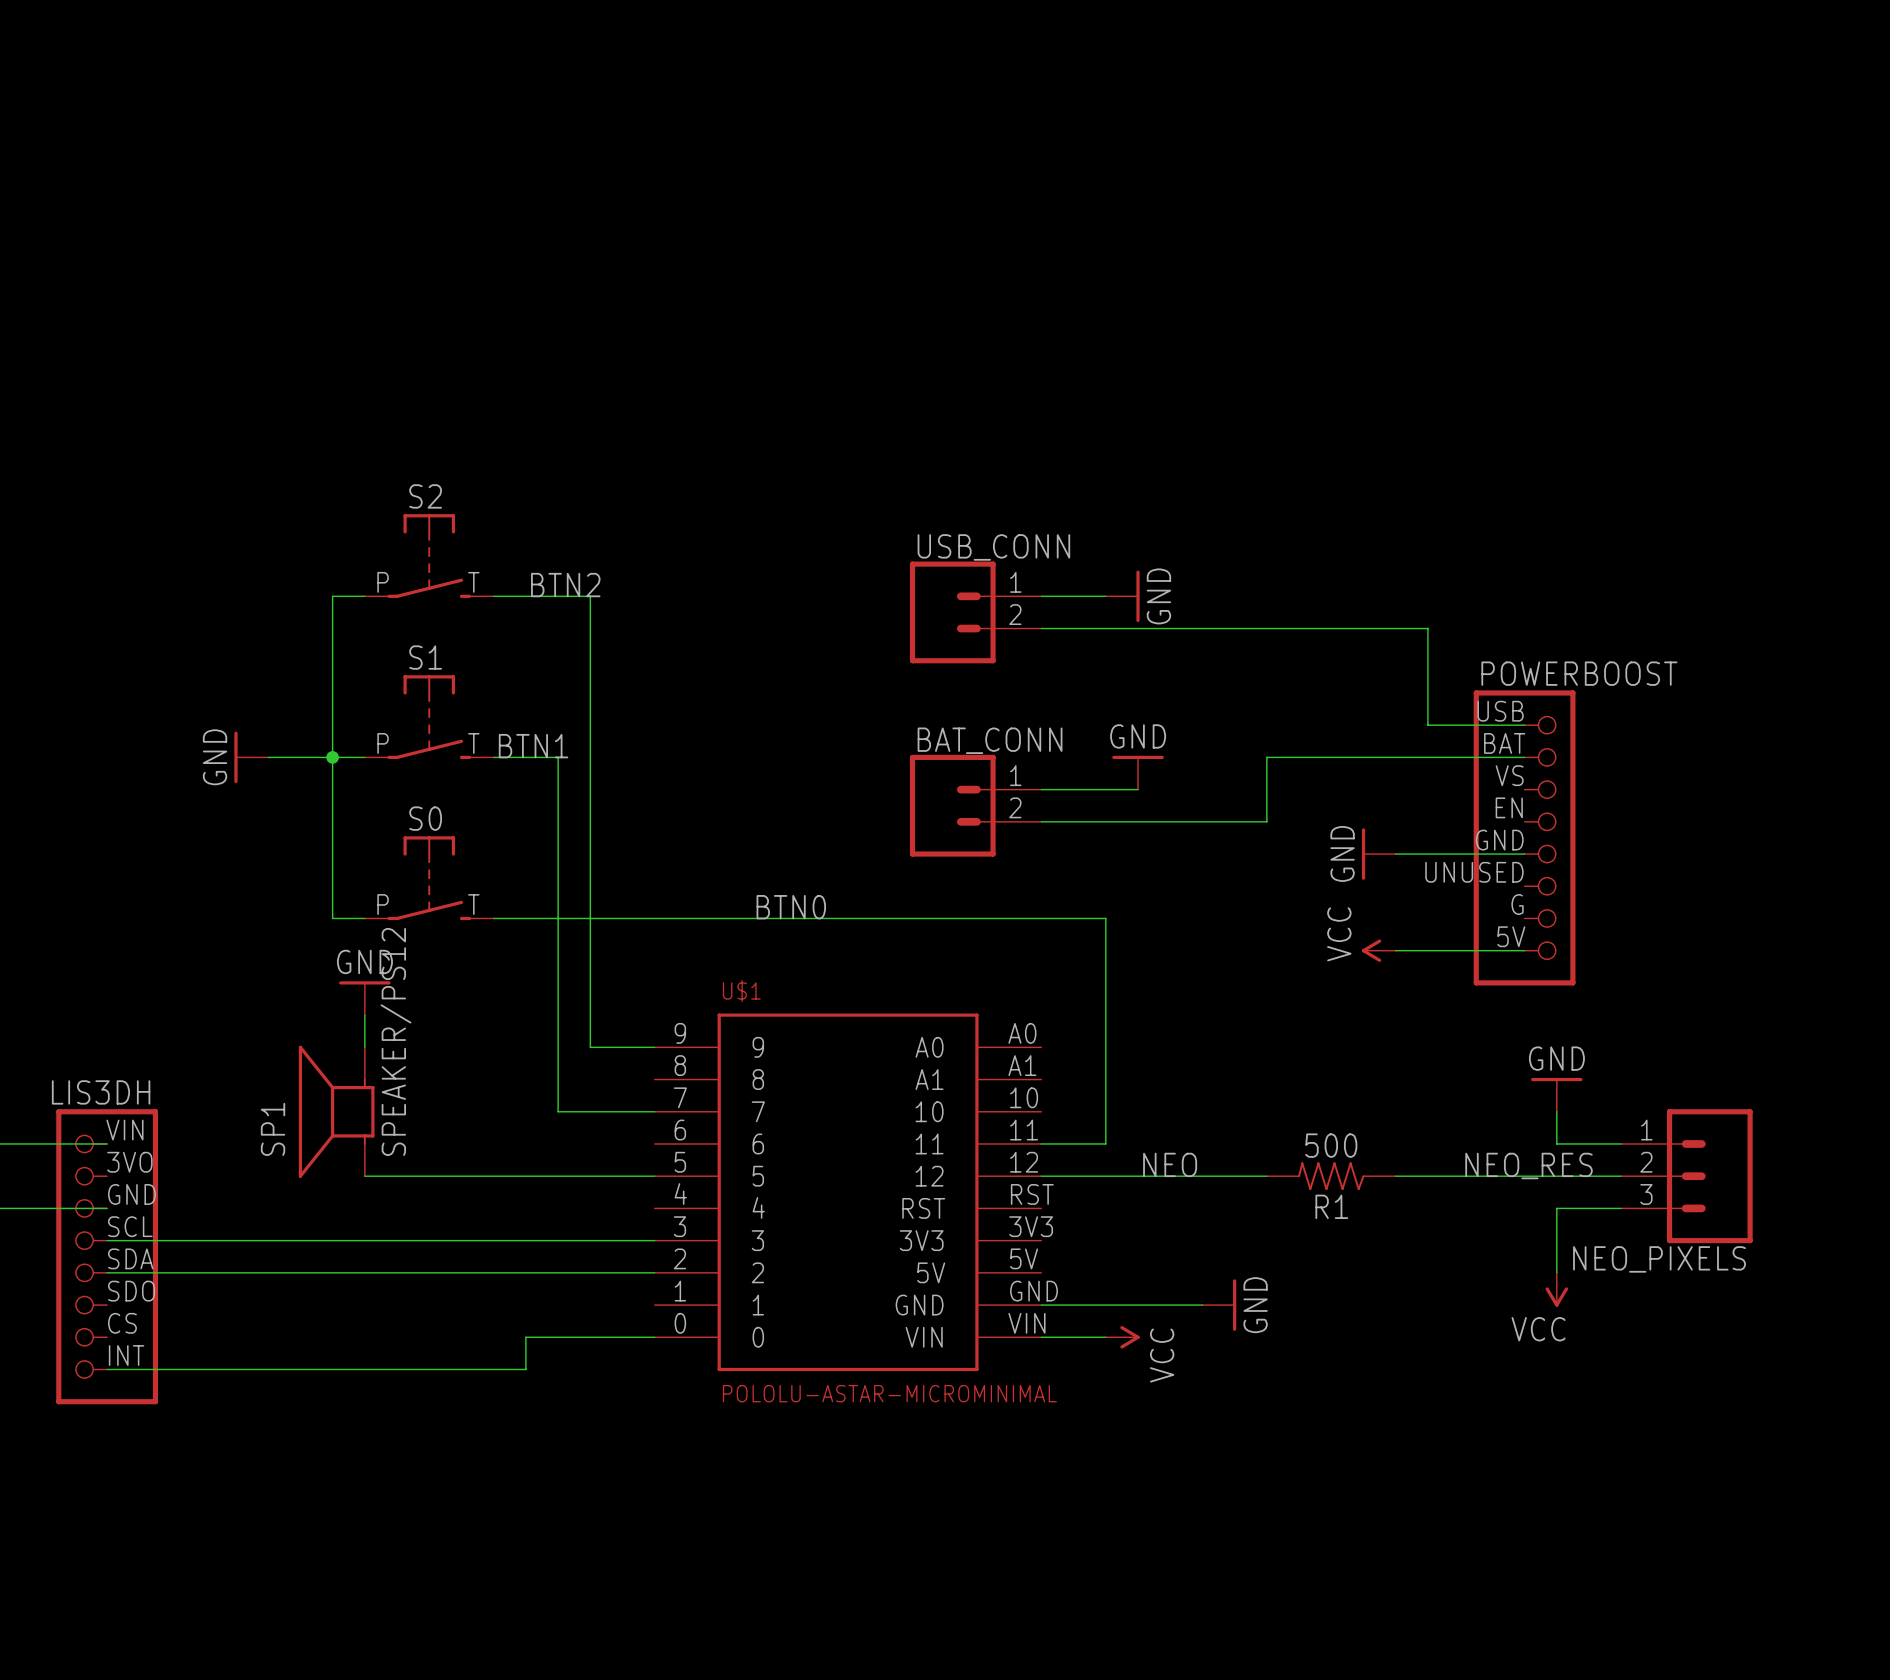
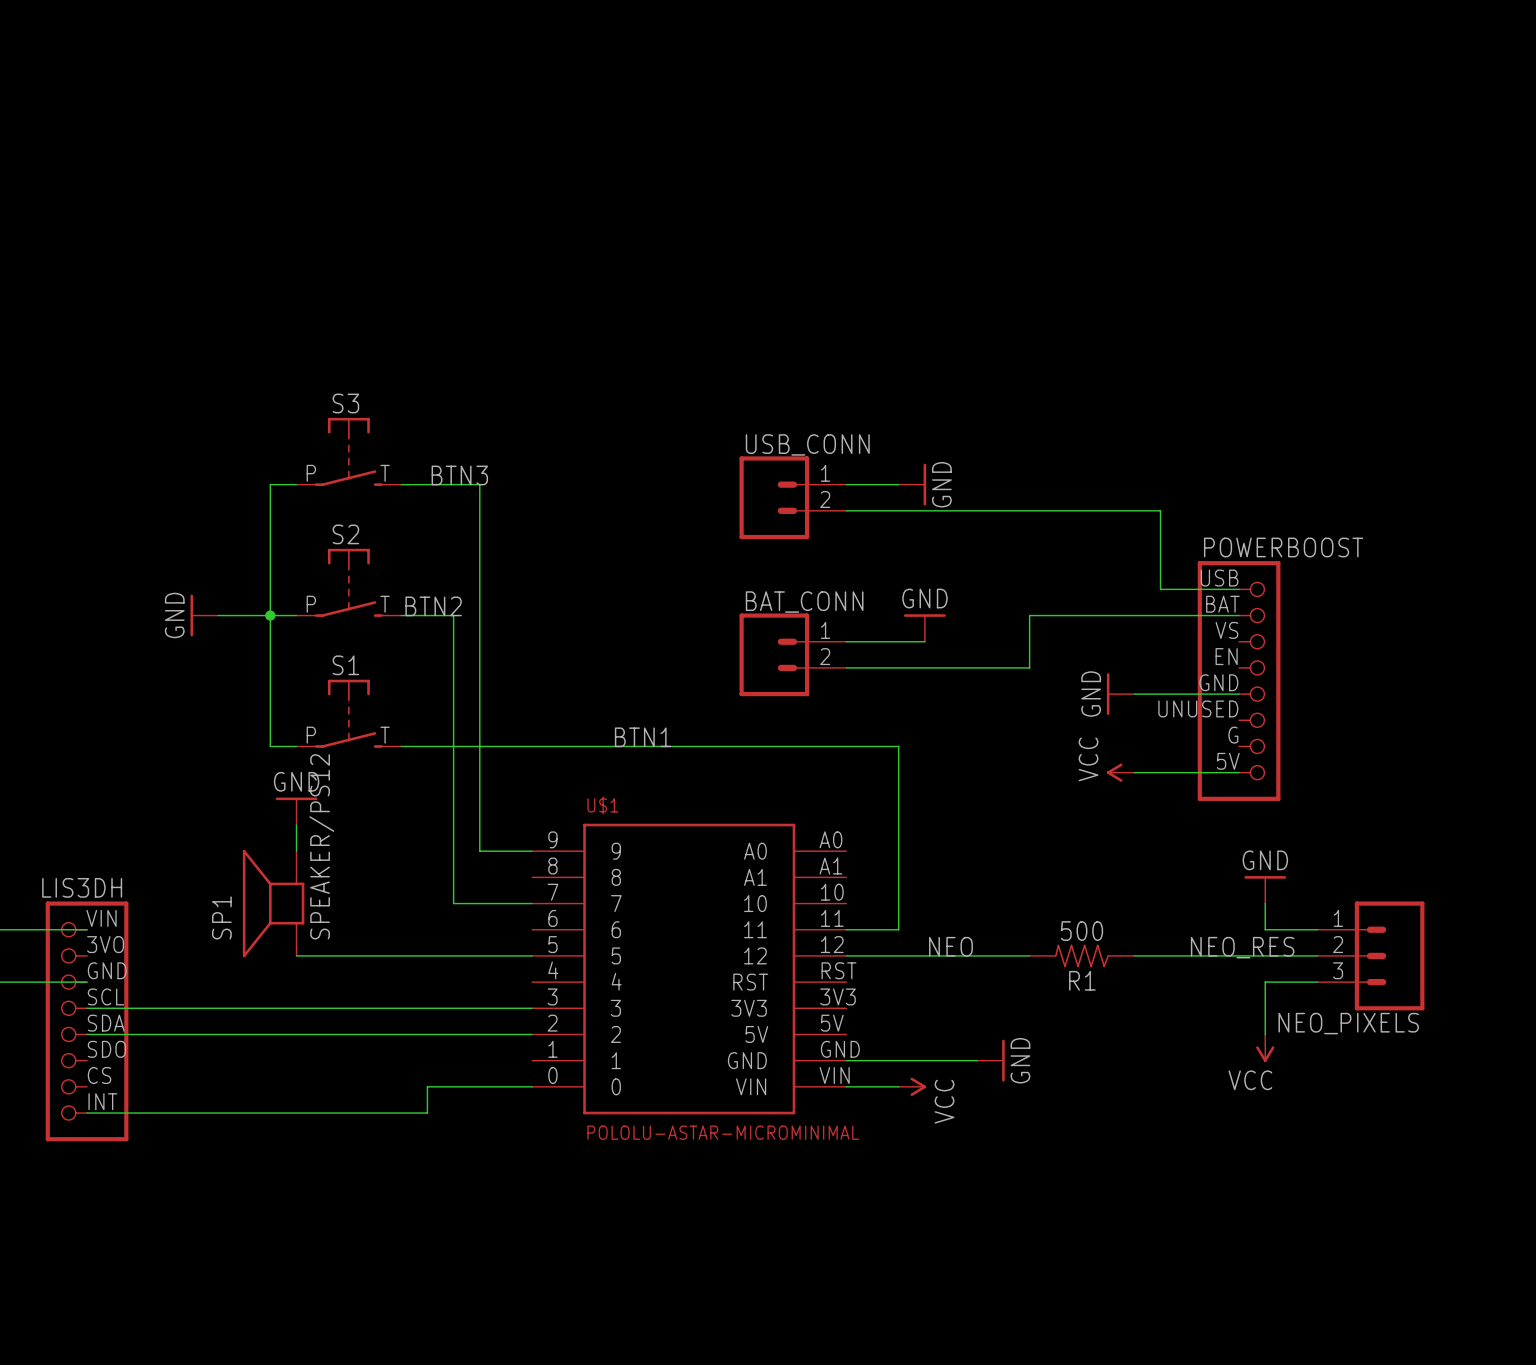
S2 name: S2 (425, 496) -> S3 (345, 403)
label: BTN2 (565, 585) -> BTN3 (459, 475)
S1 name: S1 (425, 657) -> S2 (345, 534)
label: BTN1 (533, 746) -> BTN2 (433, 606)
S0 name: S0 (425, 818) -> S1 (345, 665)
label: BTN0 (791, 907) -> BTN1 (643, 737)

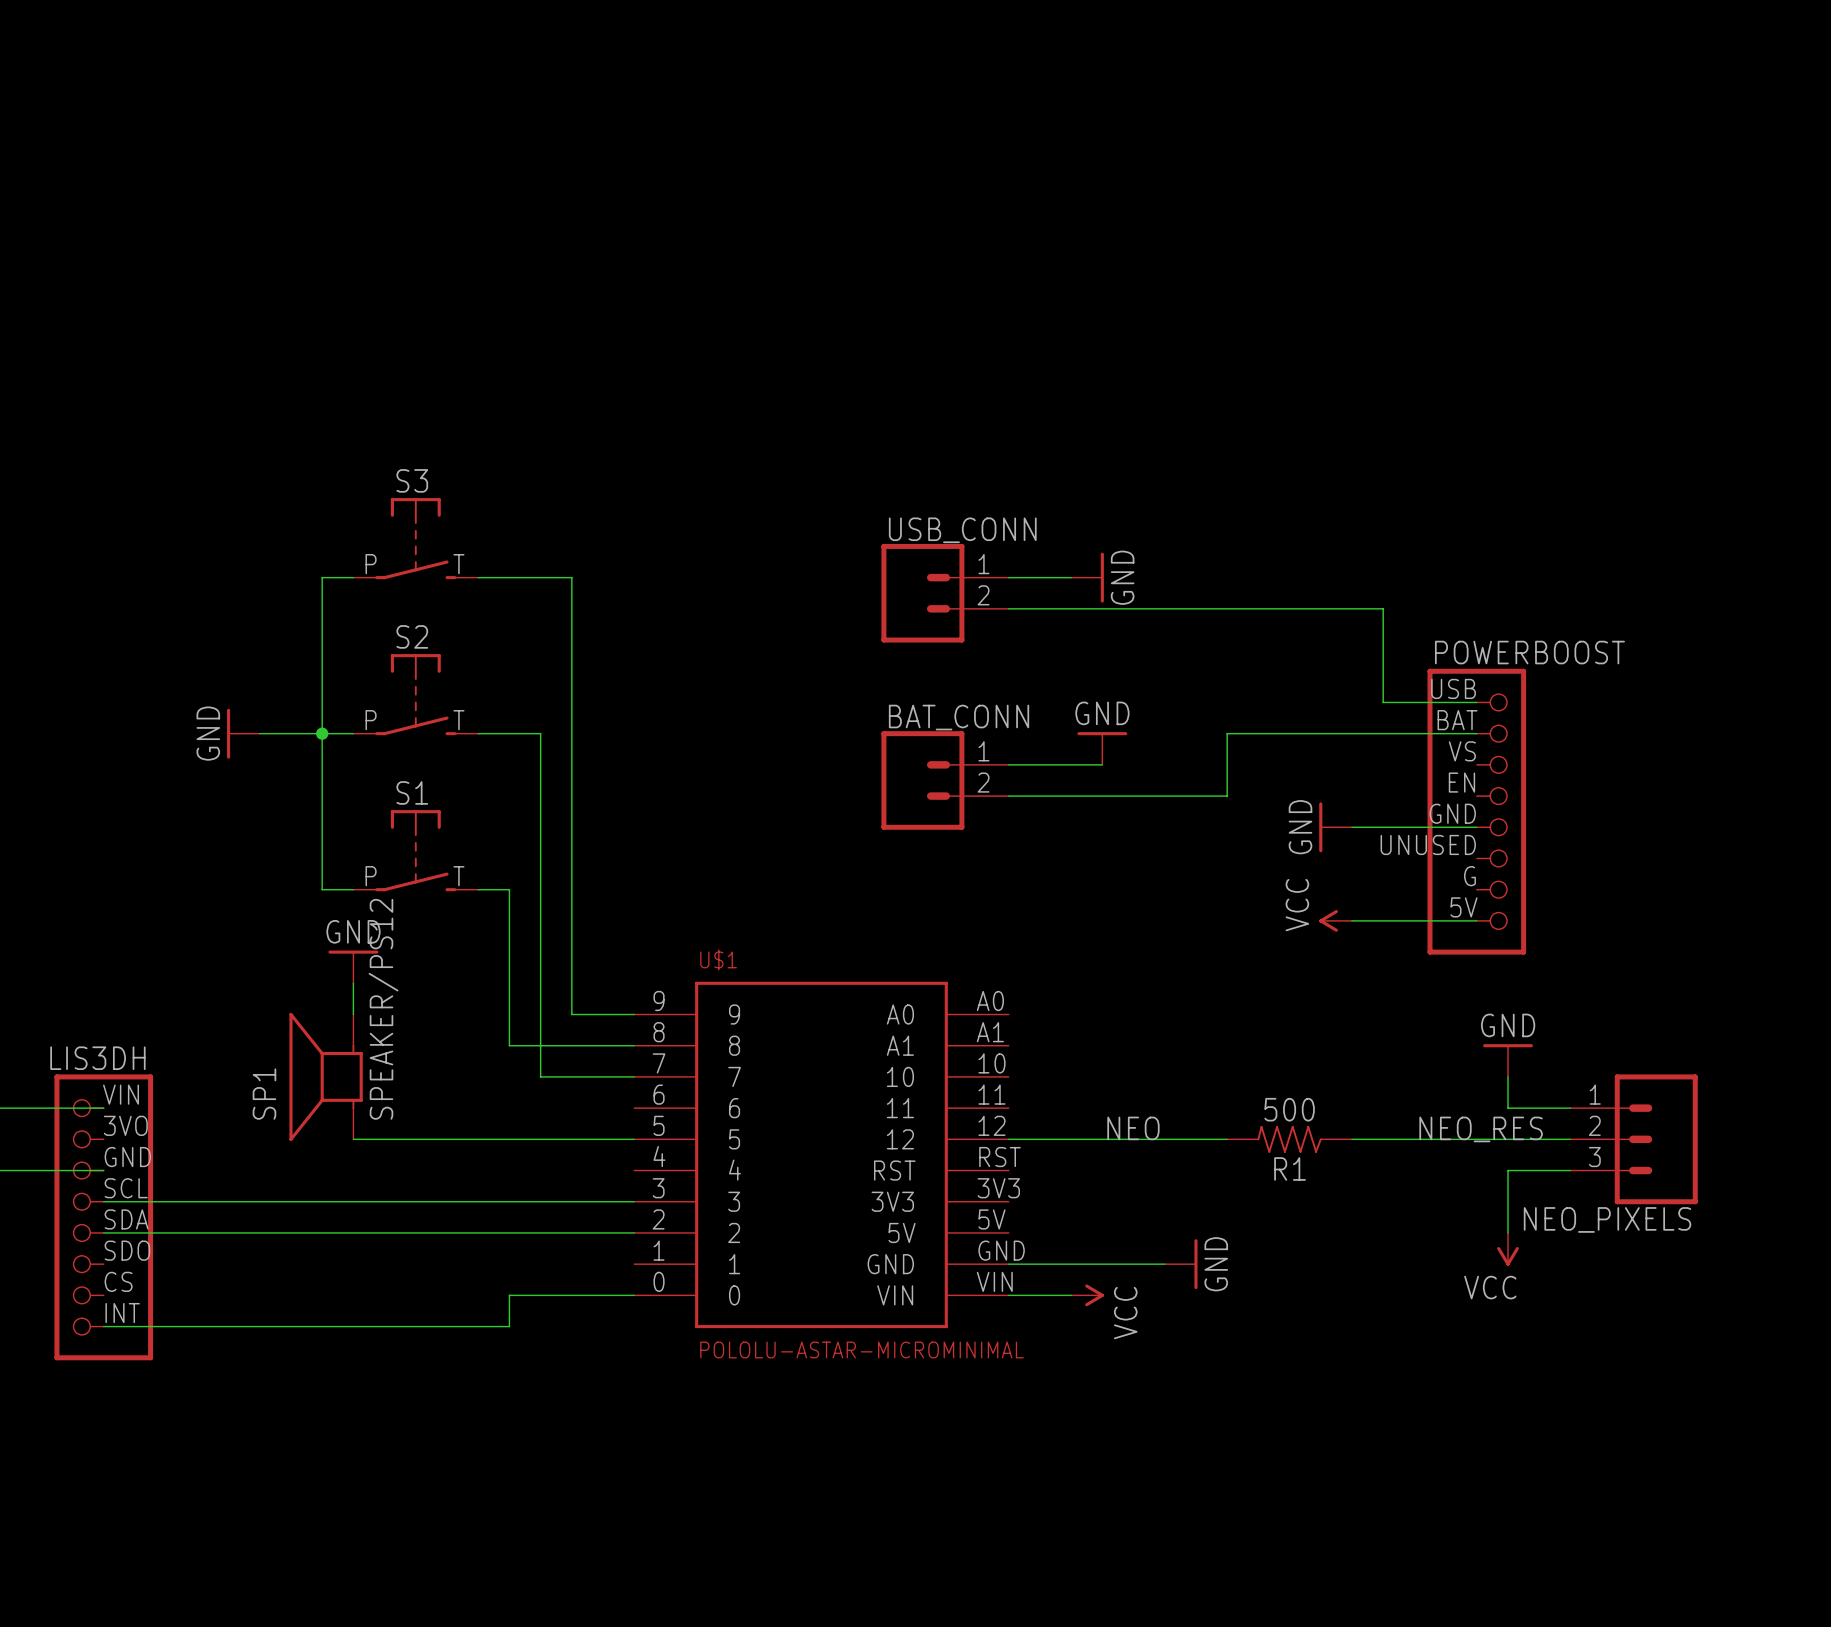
label: BTN3 (459, 475) -> none
label: BTN2 (433, 606) -> none
label: BTN1 (643, 737) -> none
wire: (427, 746) (898, 746) (898, 929) (846, 929) -> (509, 889) (509, 1045) (634, 1045)

